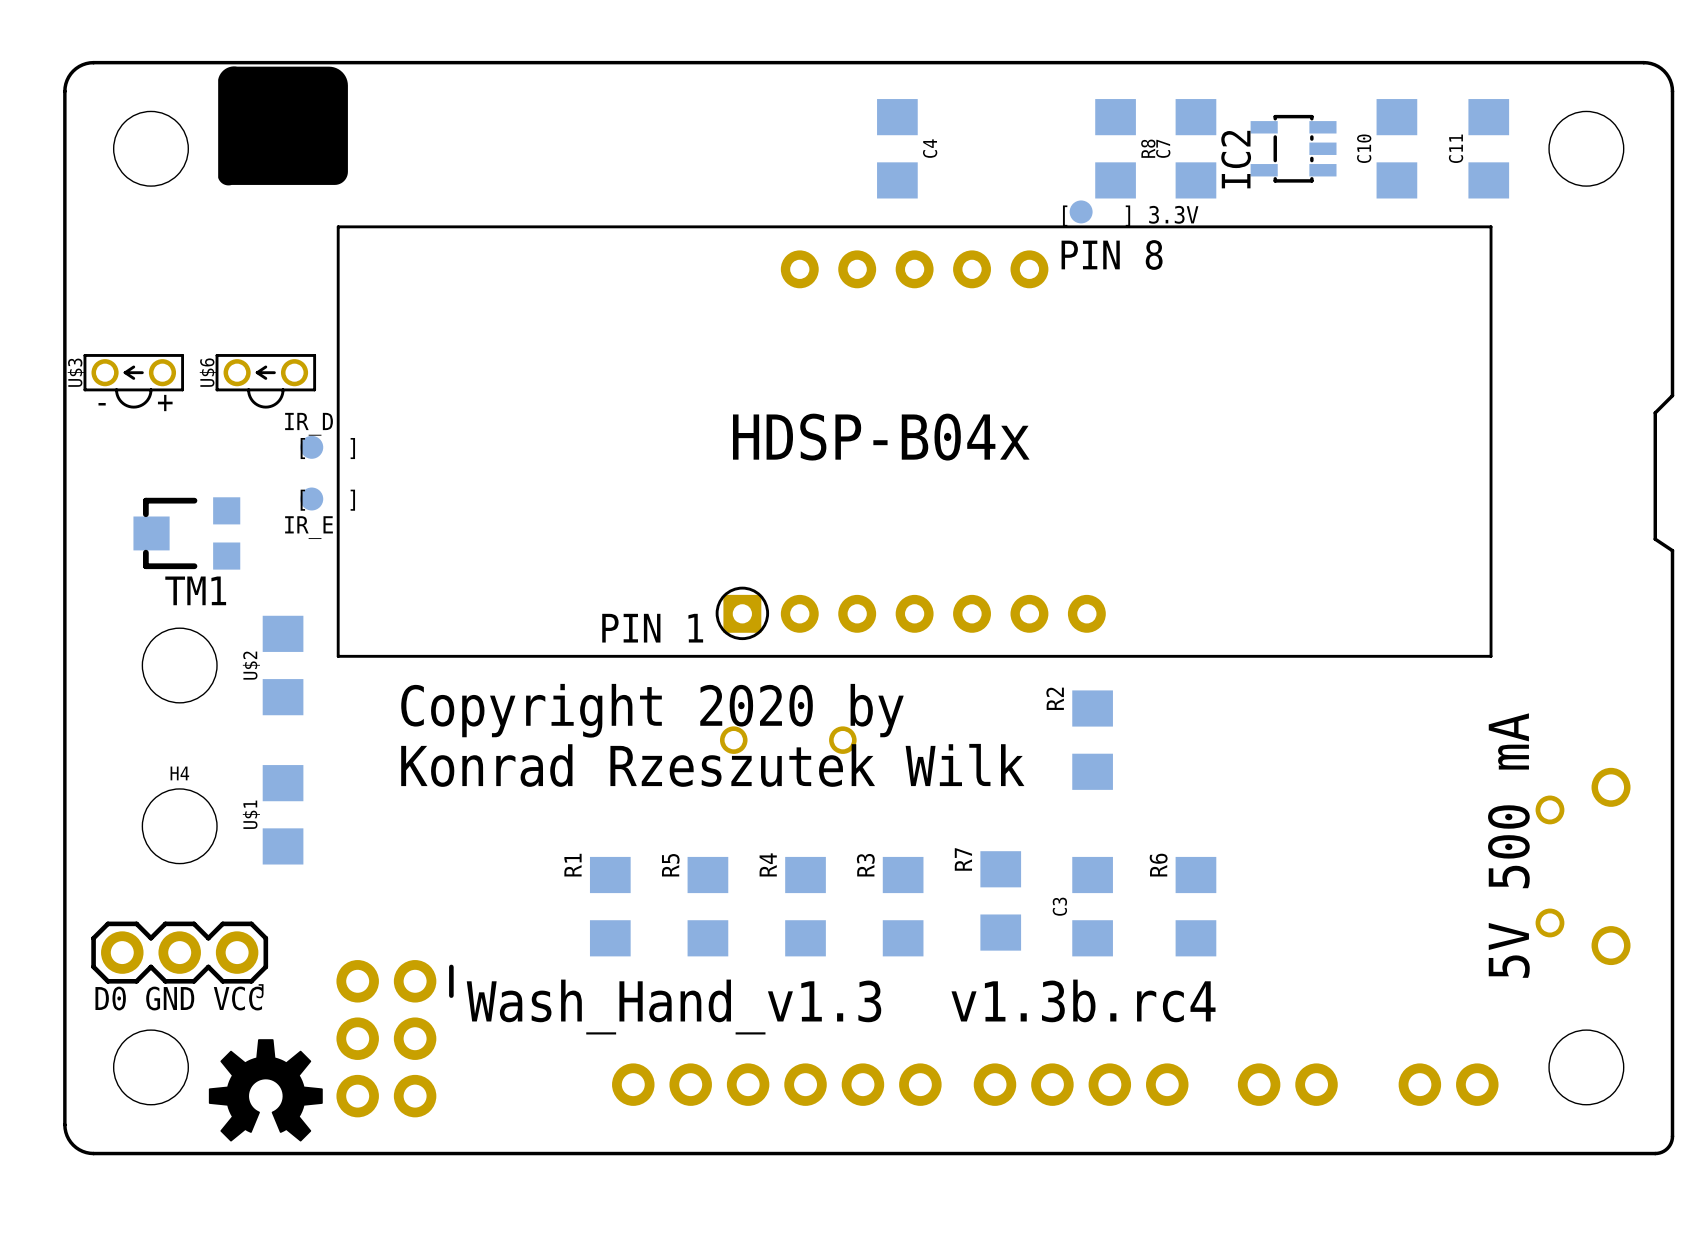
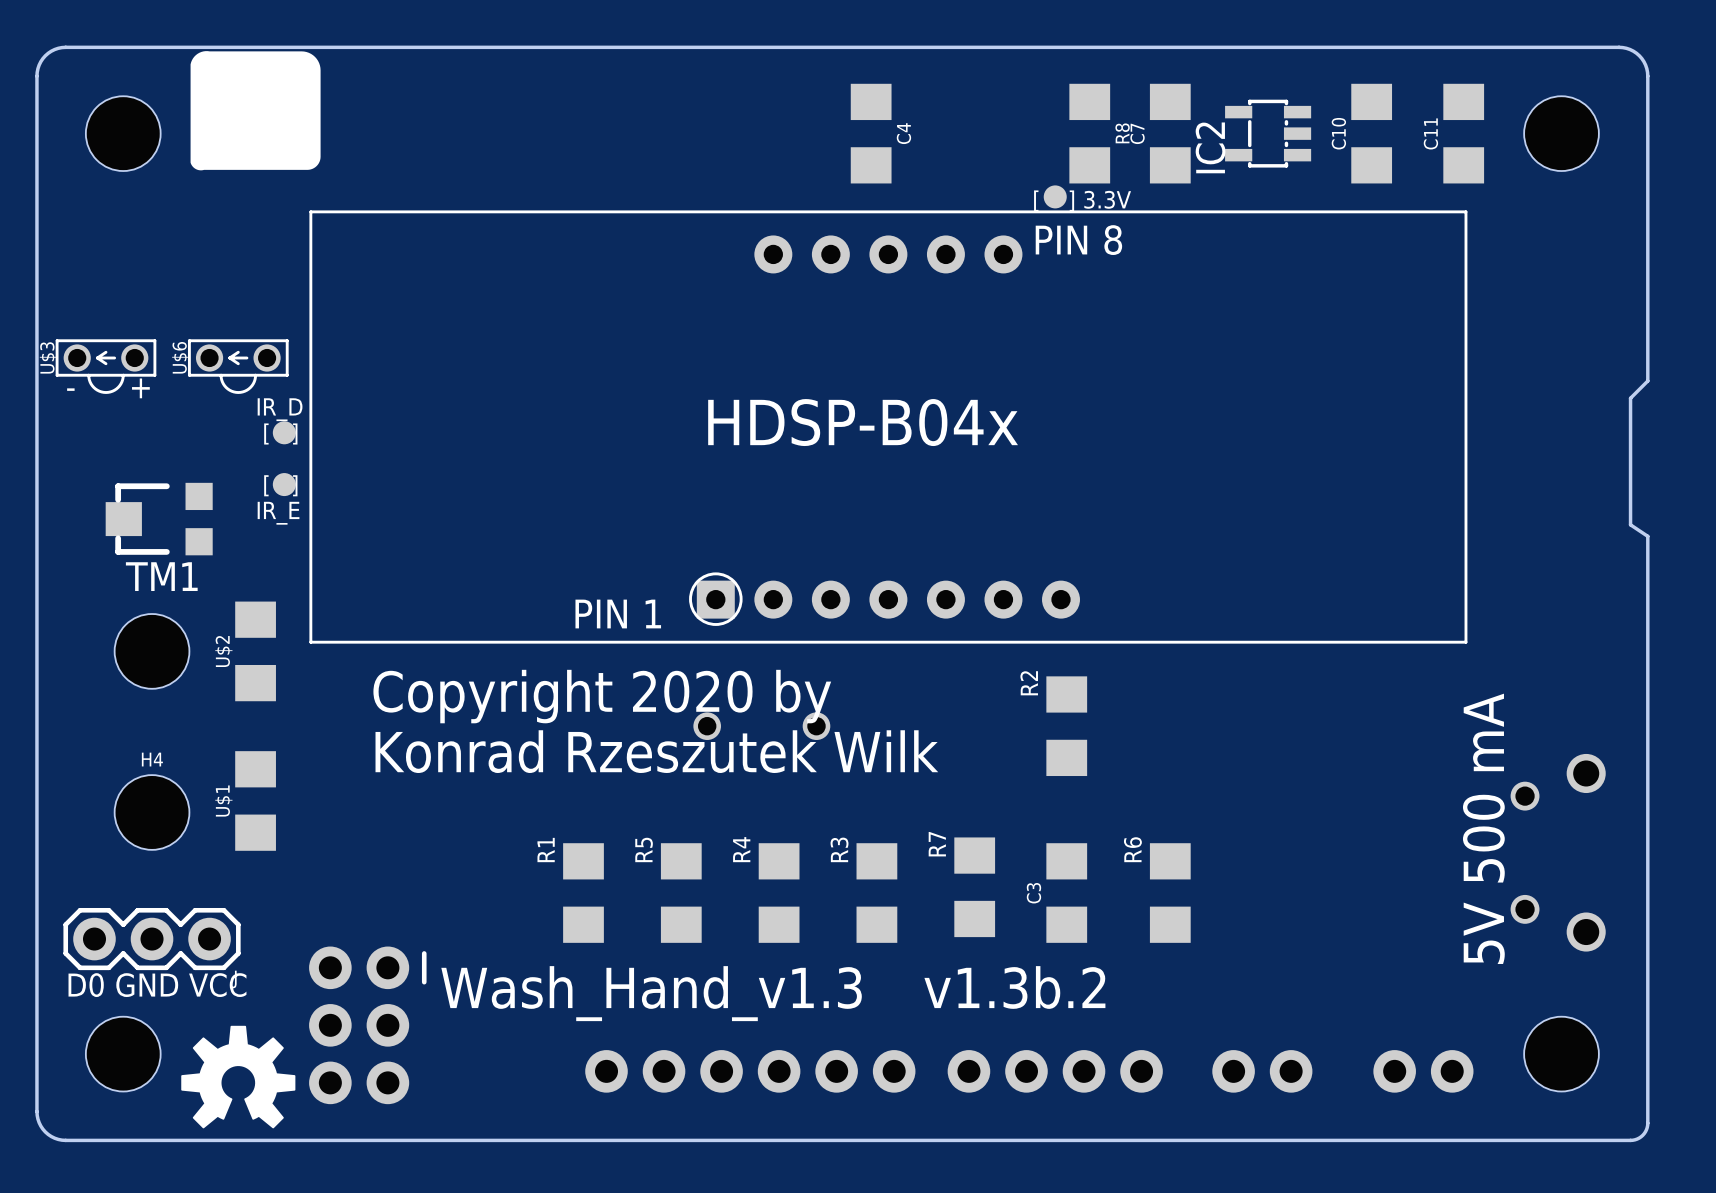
text: v1.3b.rc4 (1083, 1000) -> v1.3b.2 (1014, 987)

